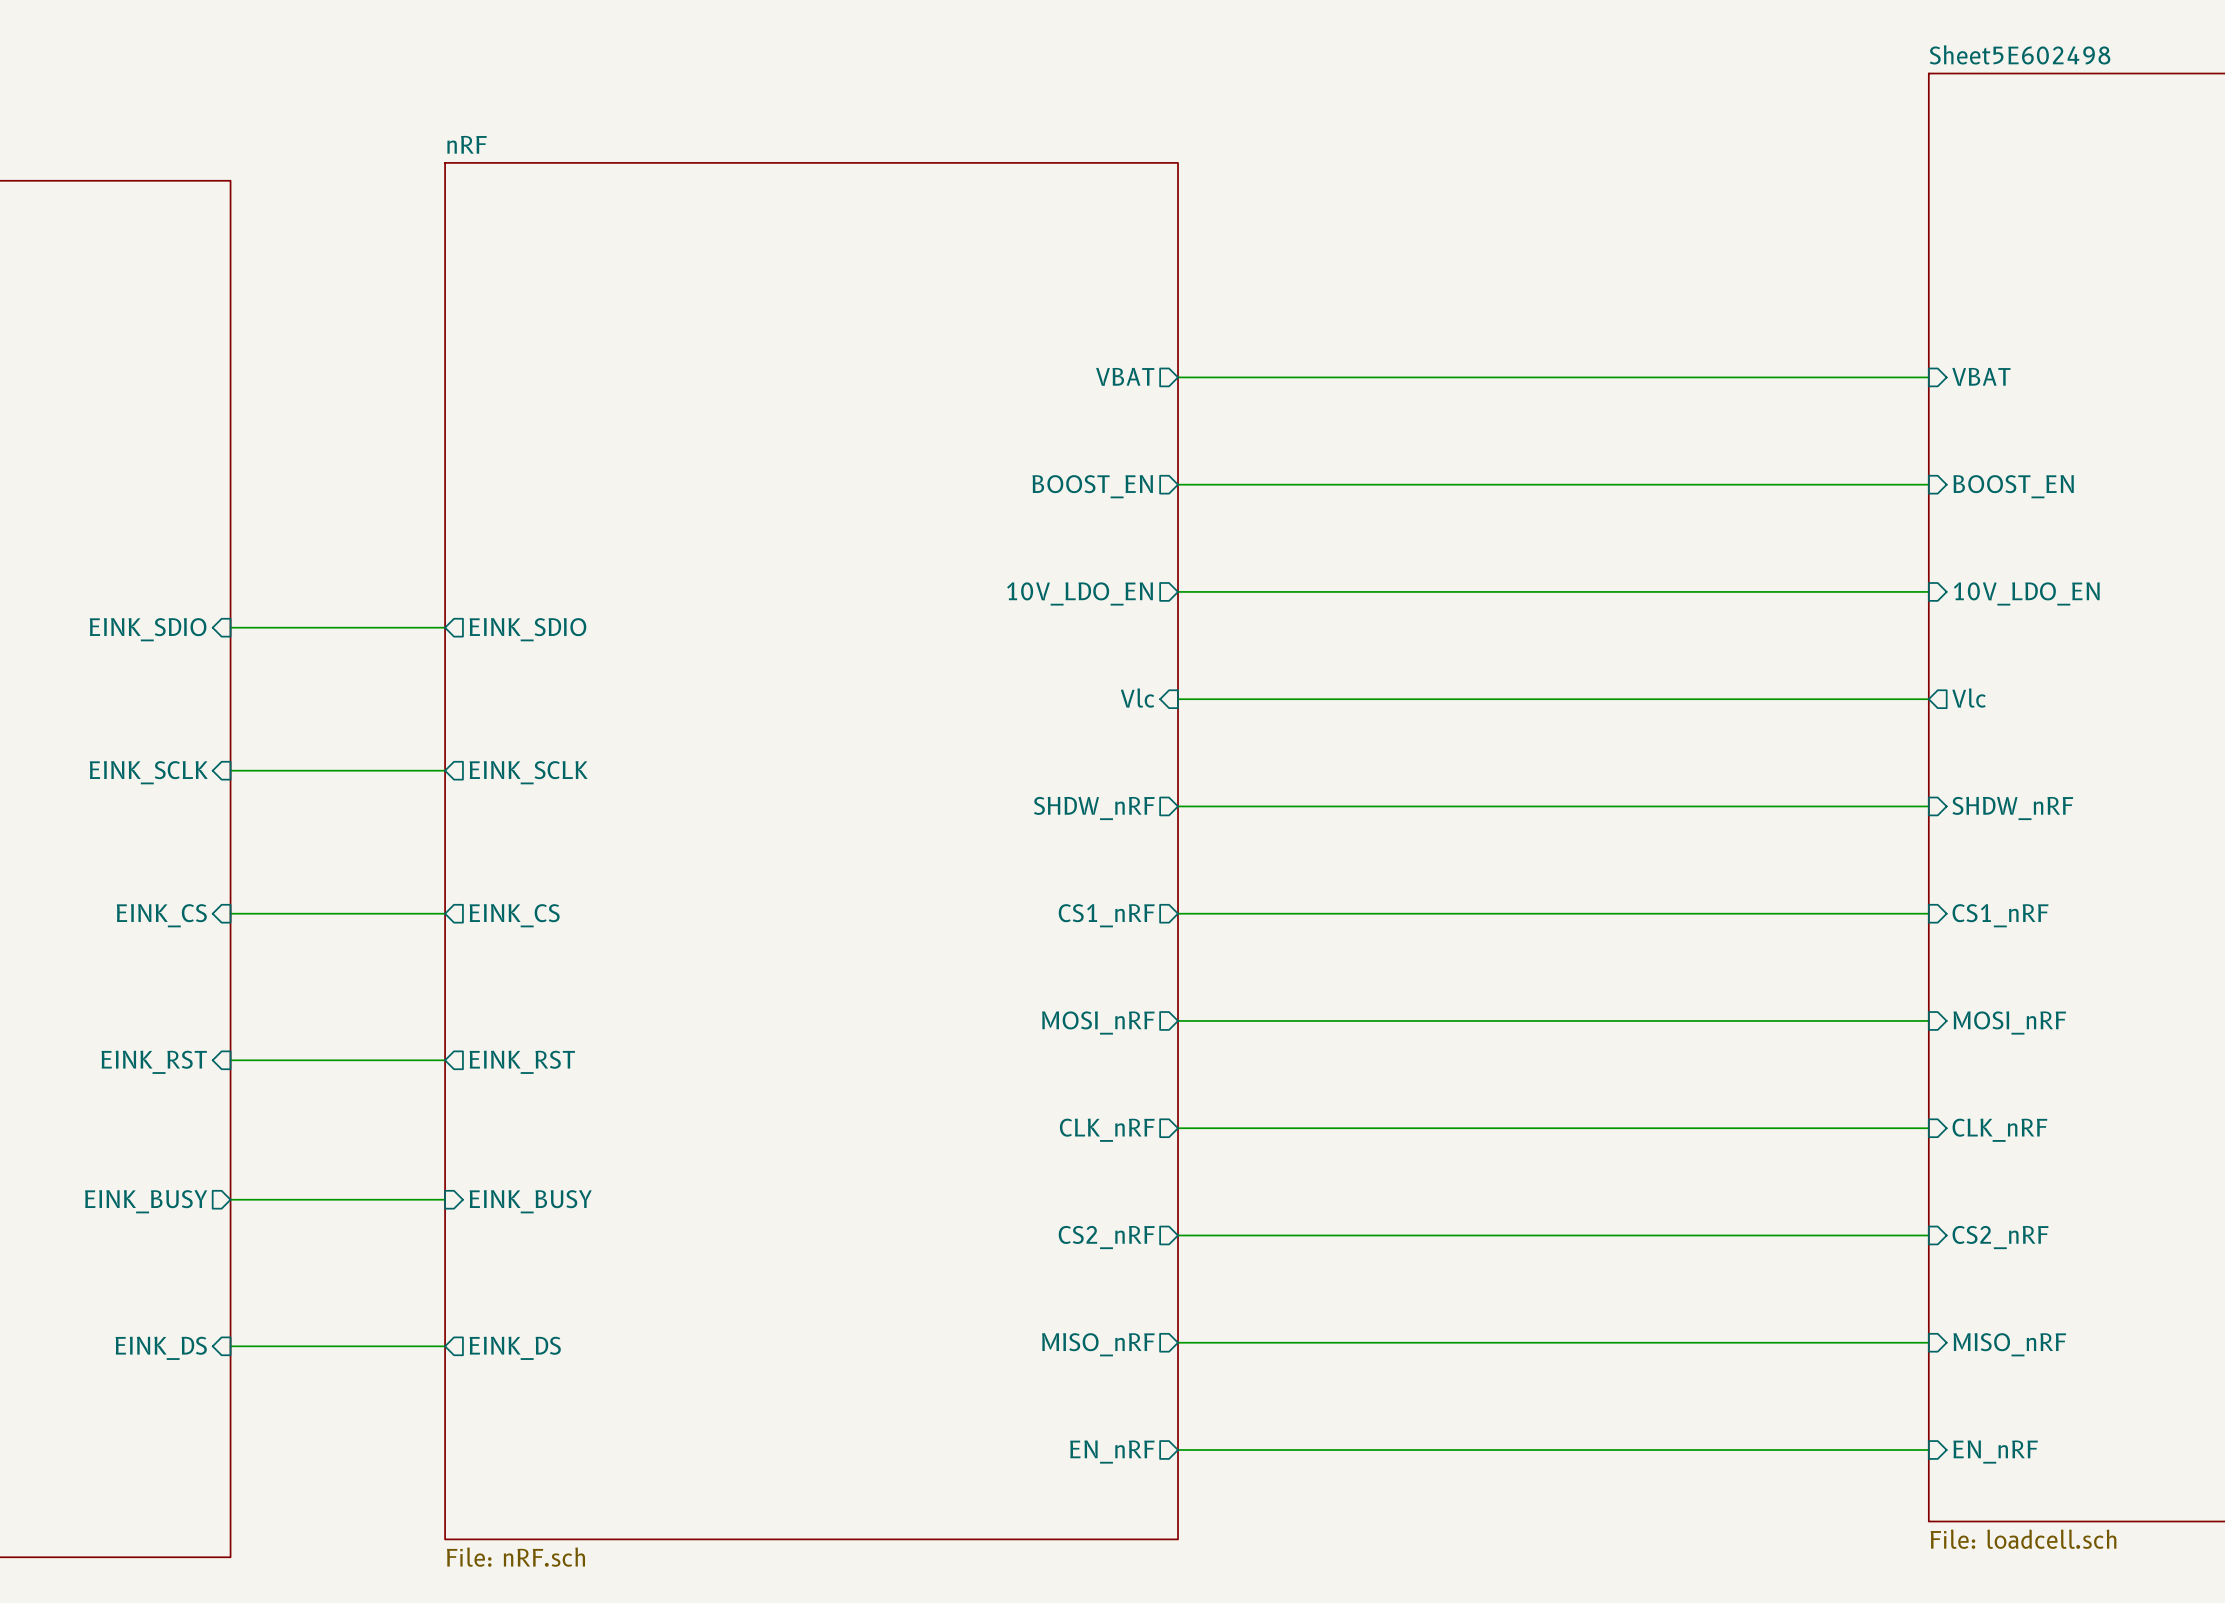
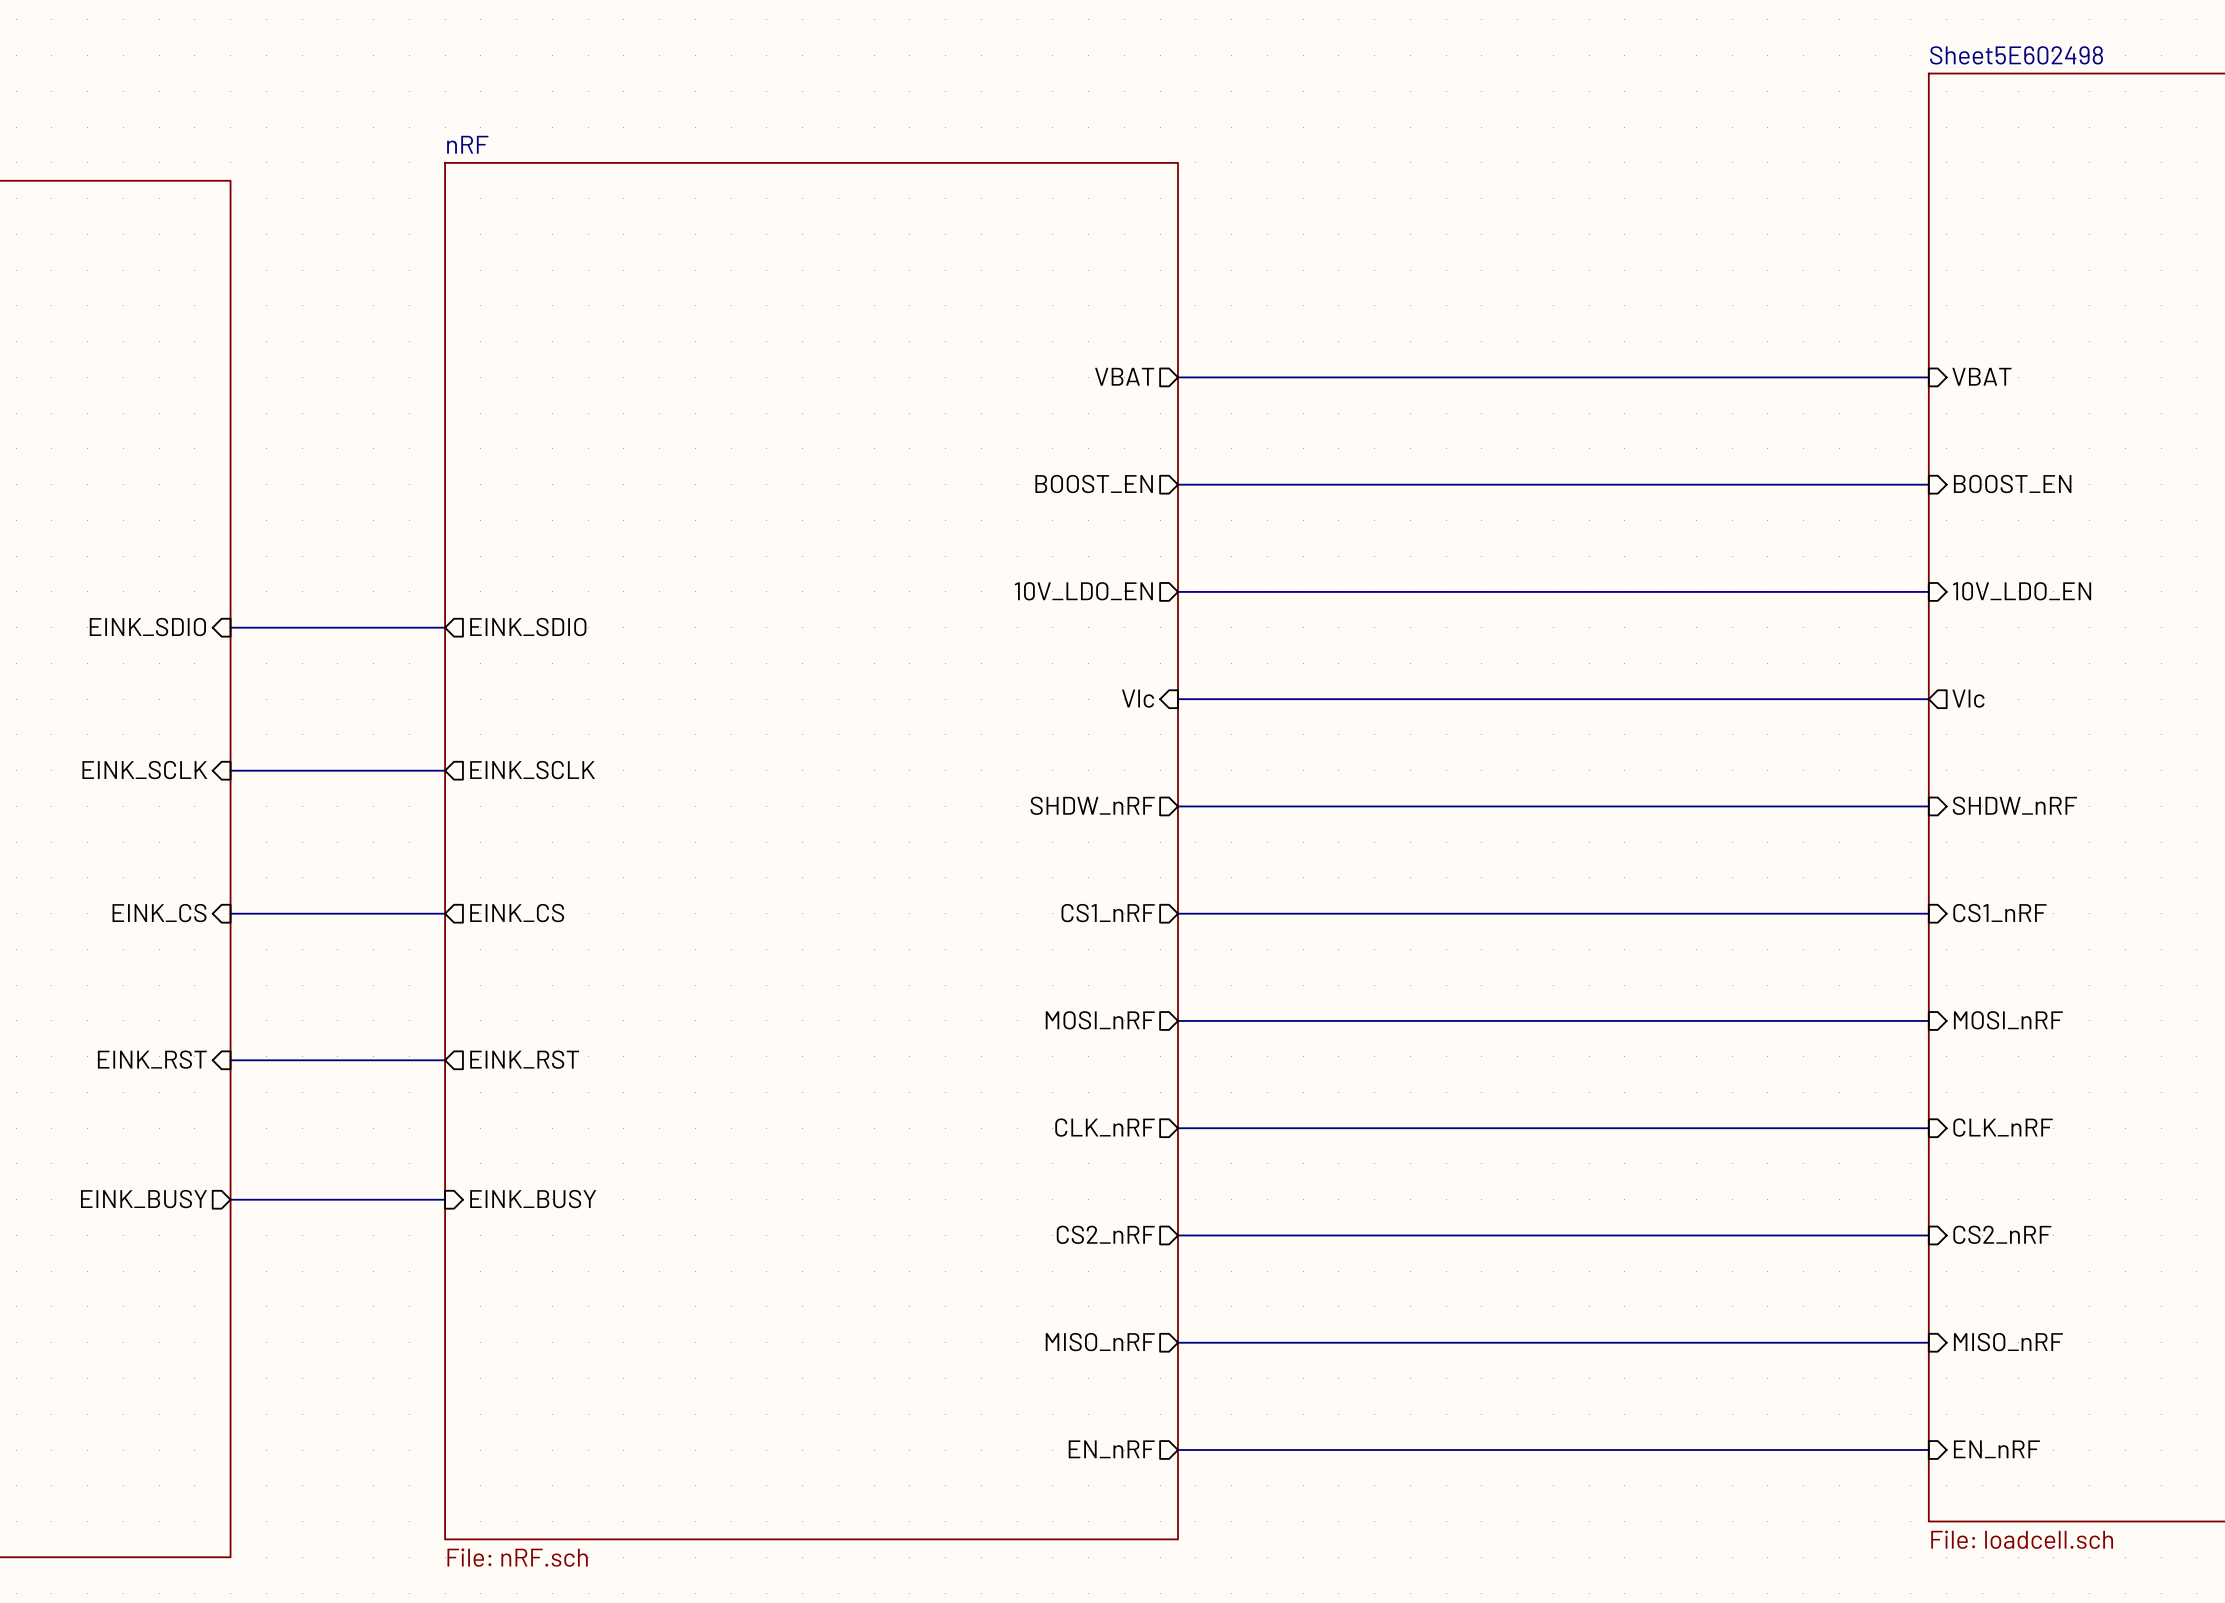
wire: (230, 1346) (445, 1346) -> none
sheet pin: EINK_DS (161, 1348) -> none
sheet pin: EINK_DS (515, 1348) -> none

